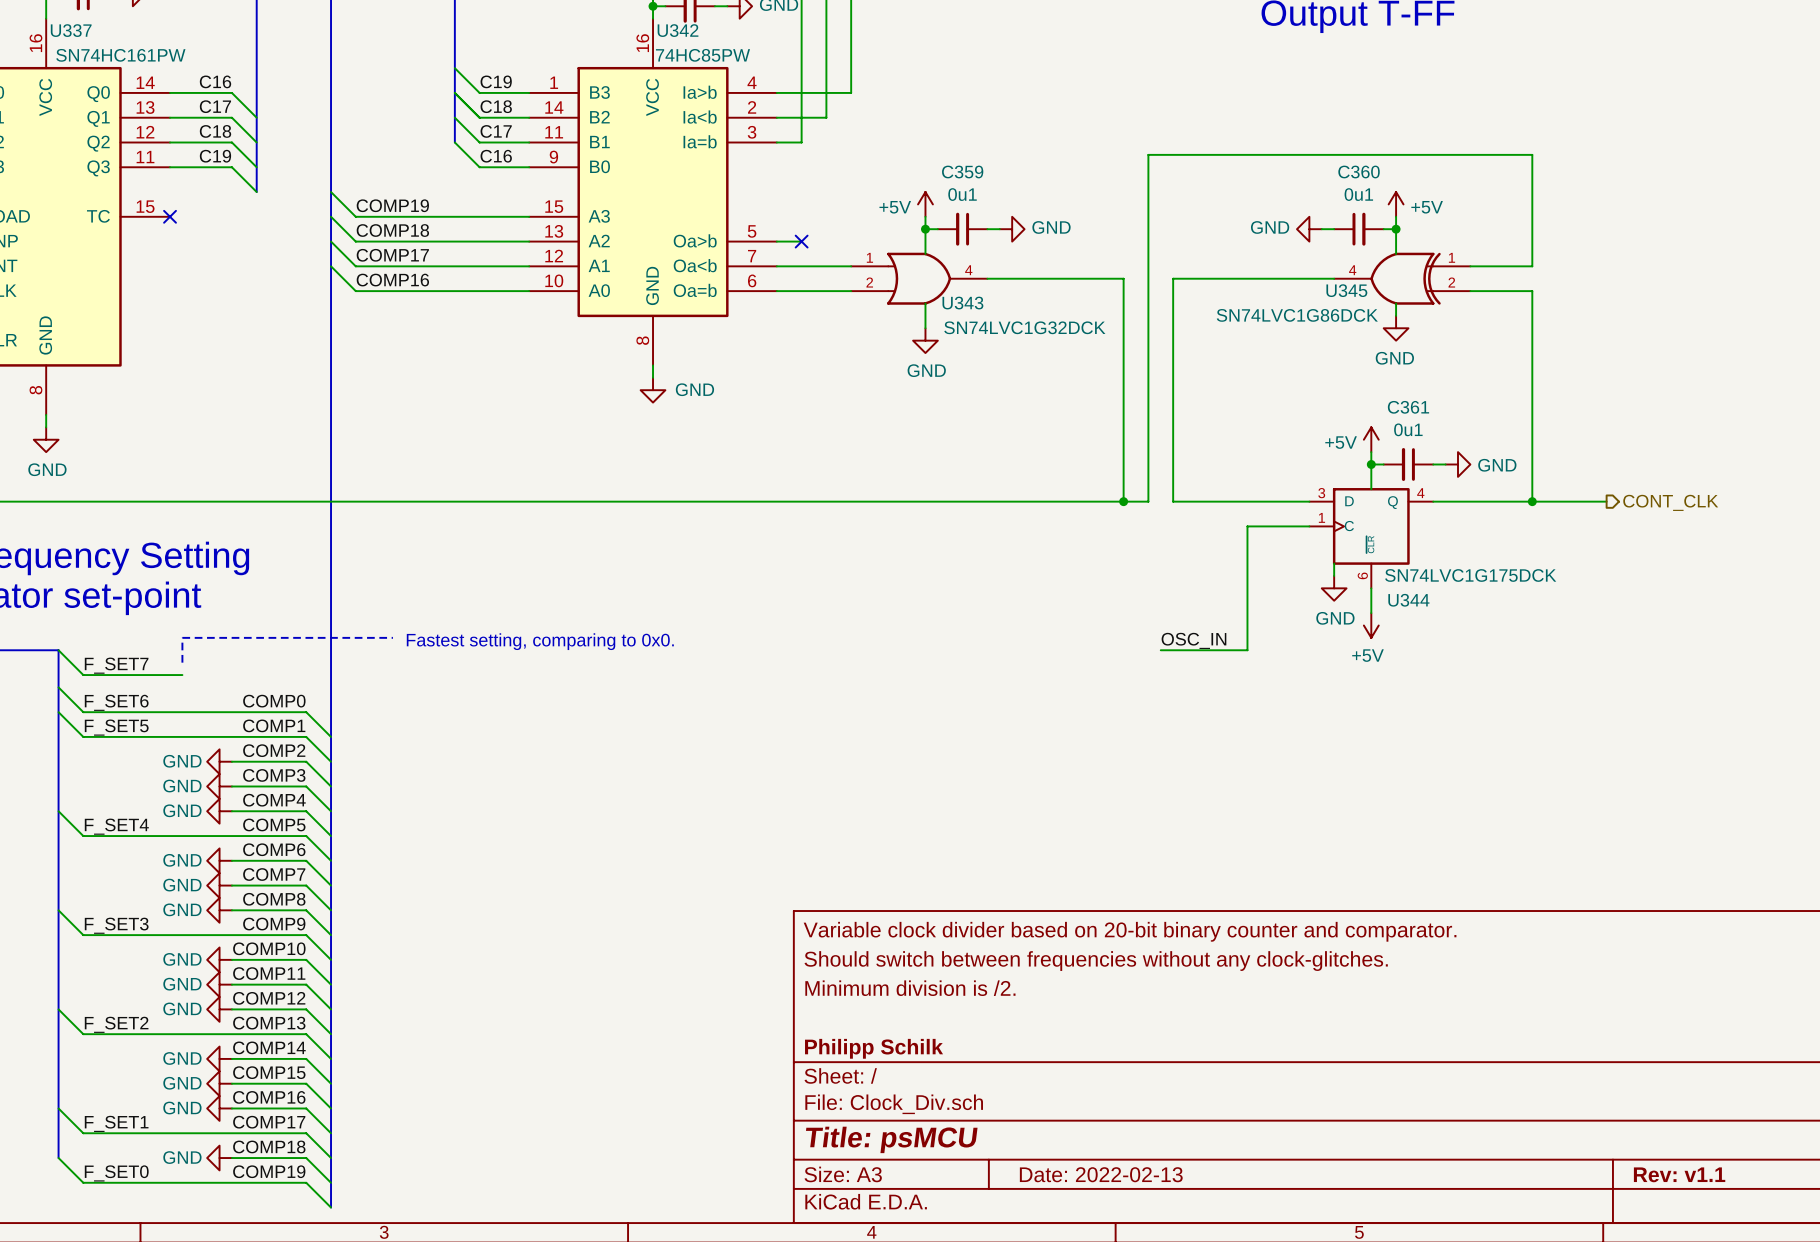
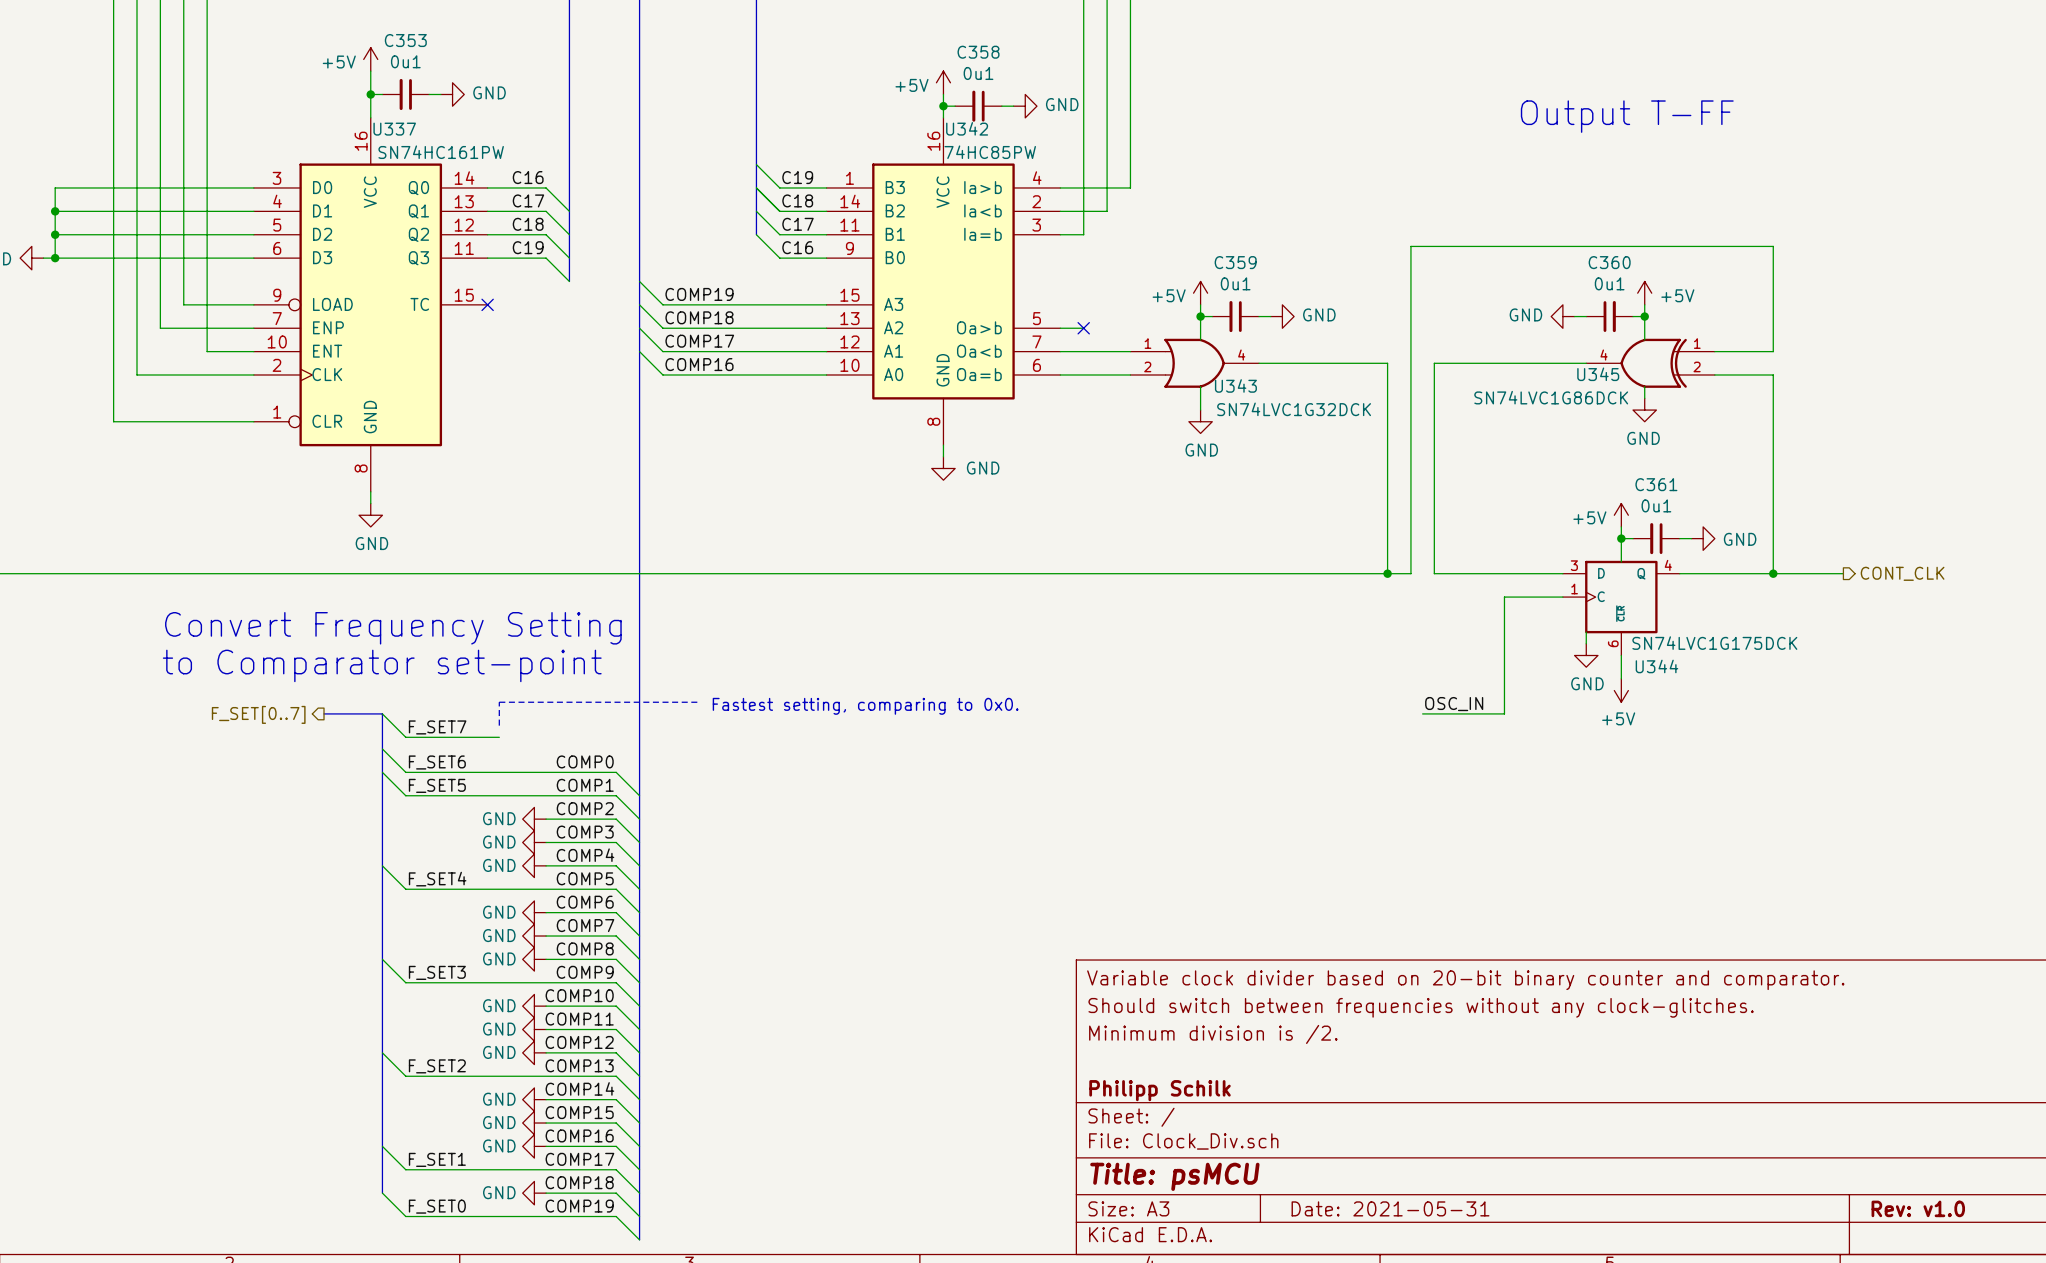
title block: Date: 2022-02-13 (1101, 1174) -> Date: 2021-05-31 (1390, 1208)
title block: Rev: v1.1 (1679, 1174) -> Rev: v1.0 (1918, 1208)

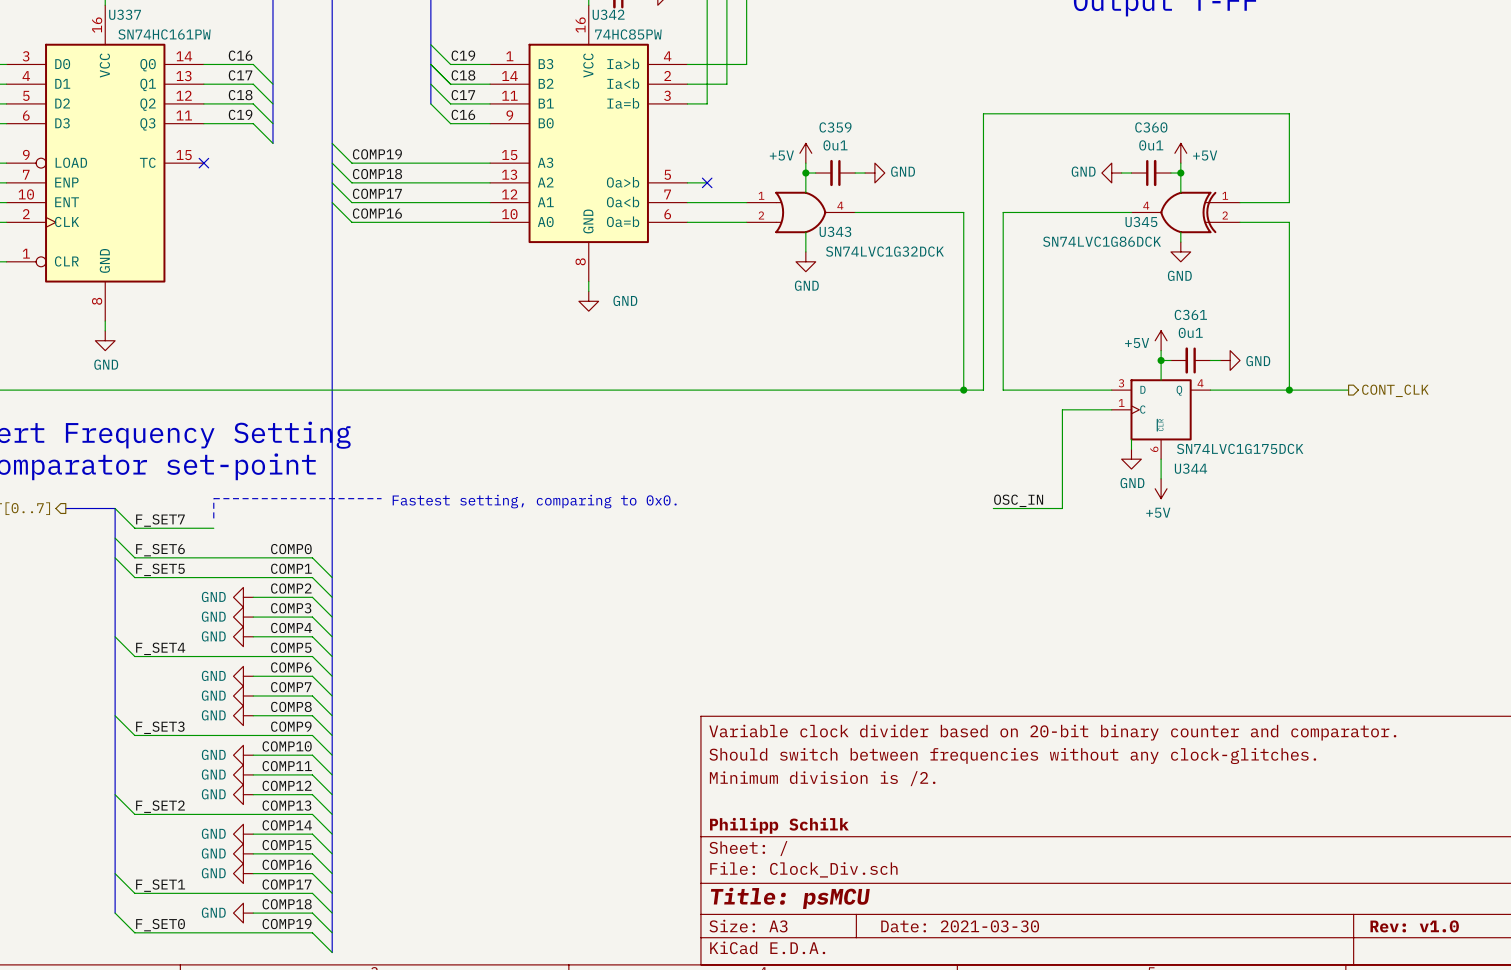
title block: Date: 2021-05-31 (1390, 1208) -> Date: 2021-03-30 (960, 926)

